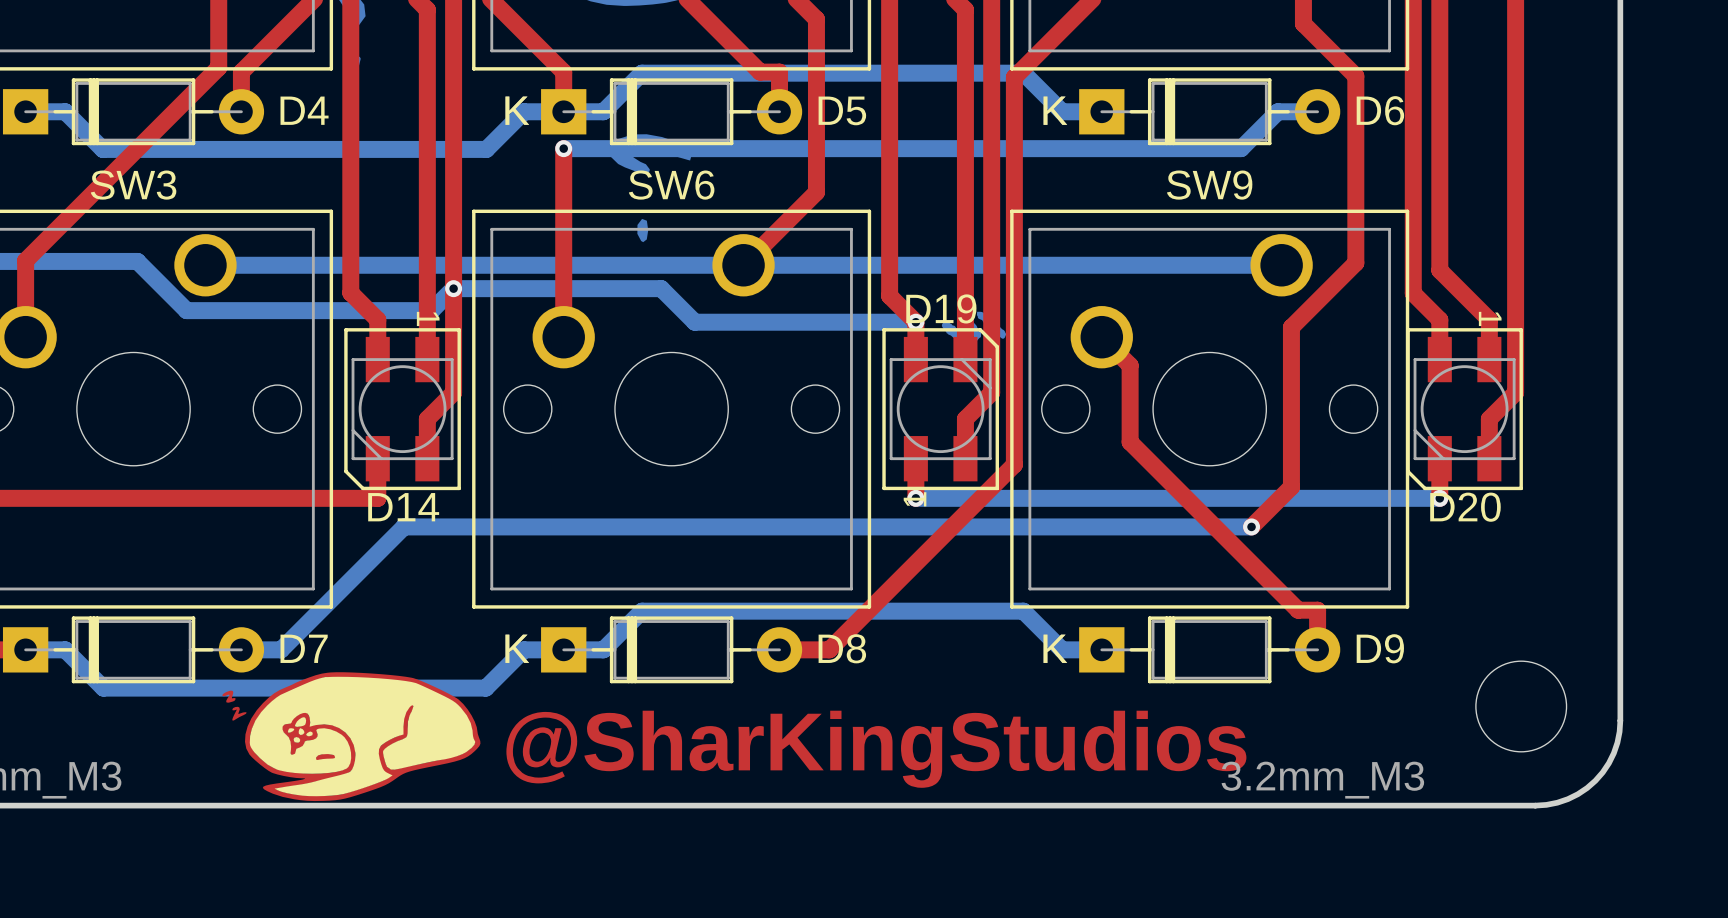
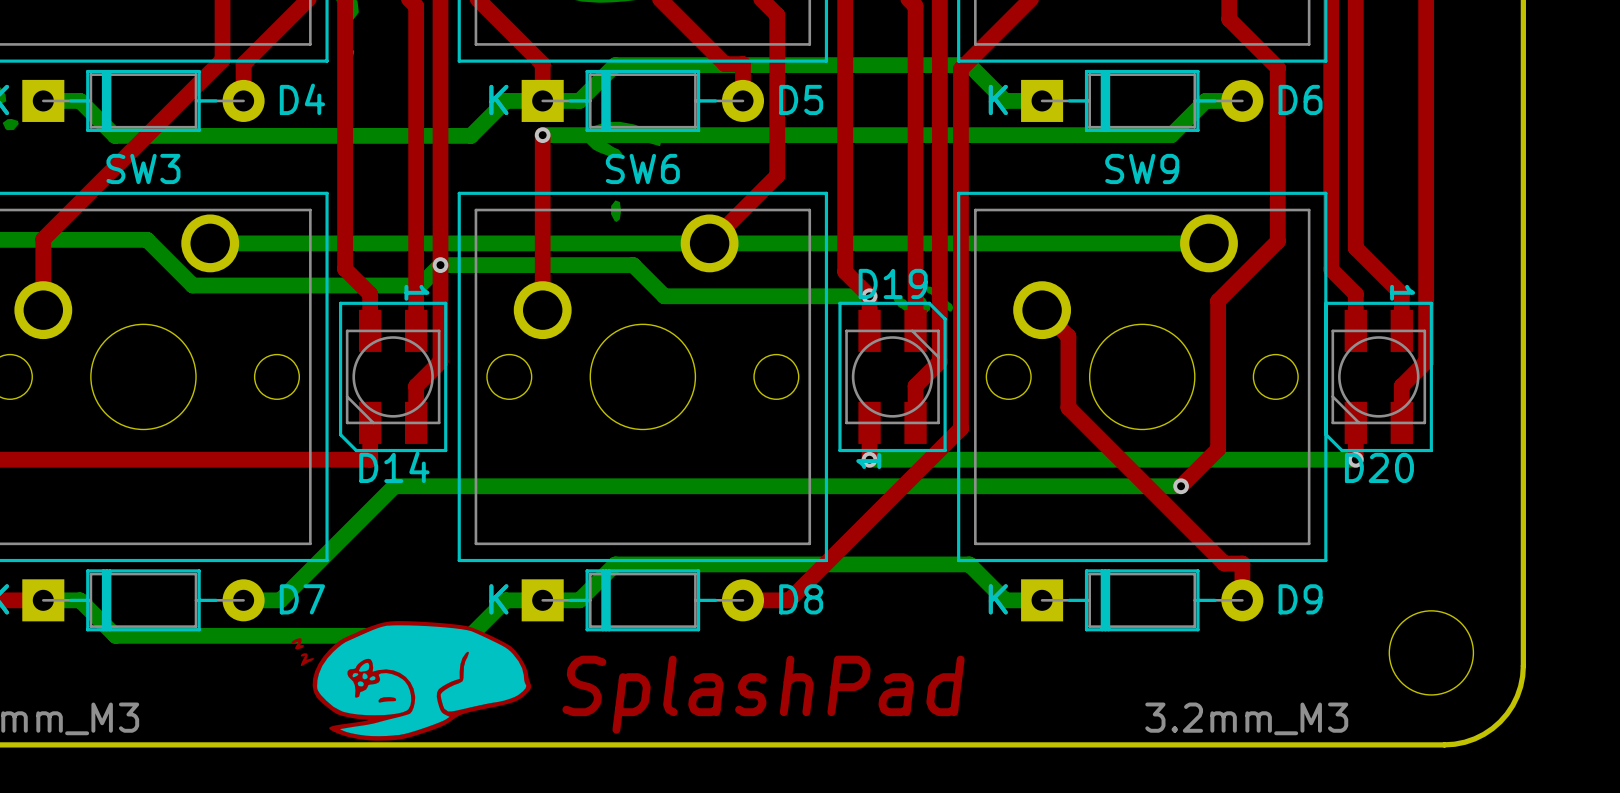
drawing position: (351, 736) -> (411, 680)
text: none -> SplashPad (763, 694)
text: @SharKingStudios (876, 749) -> none

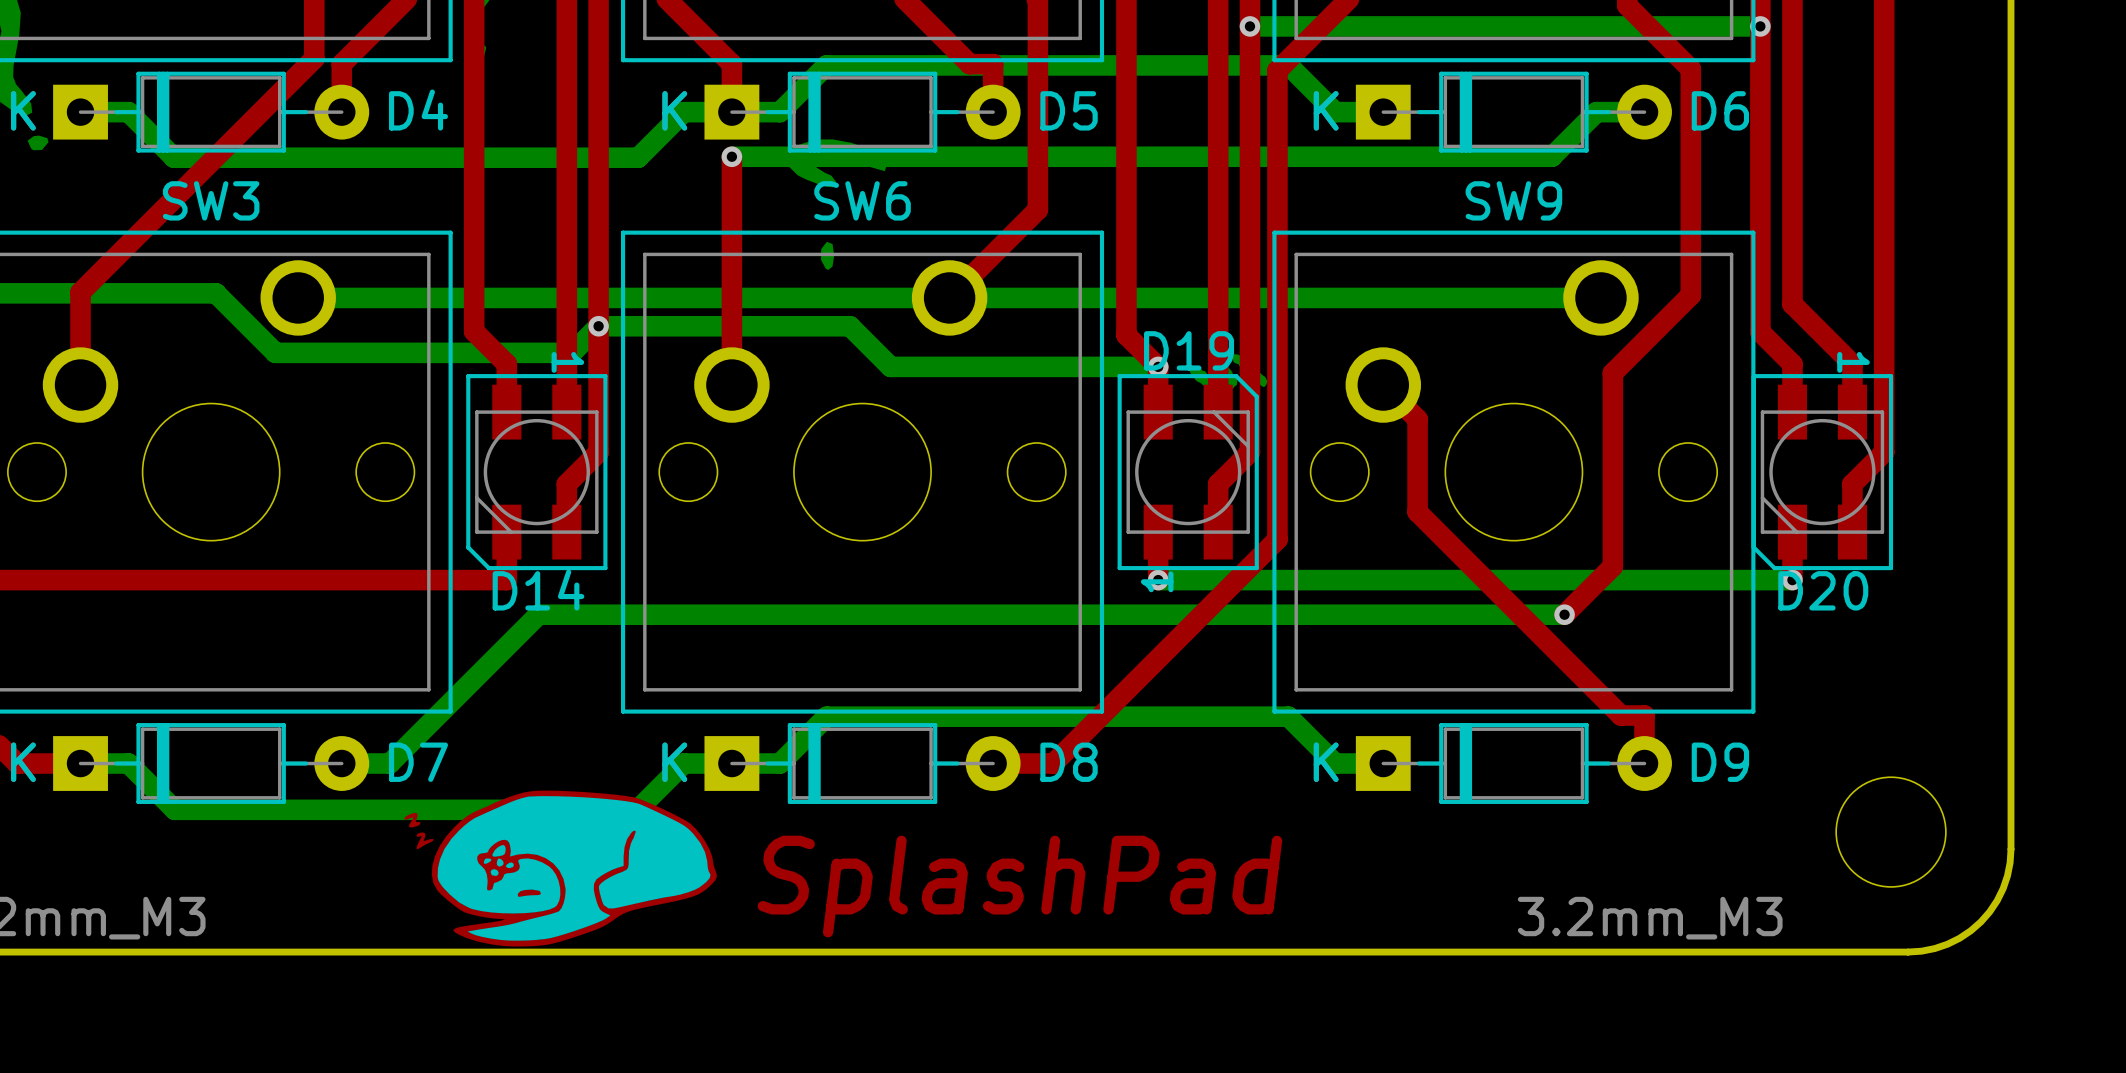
bottom track: none -> (1249, 26) (1760, 26)
via: none -> (1249, 26)
via: none -> (1760, 26)

